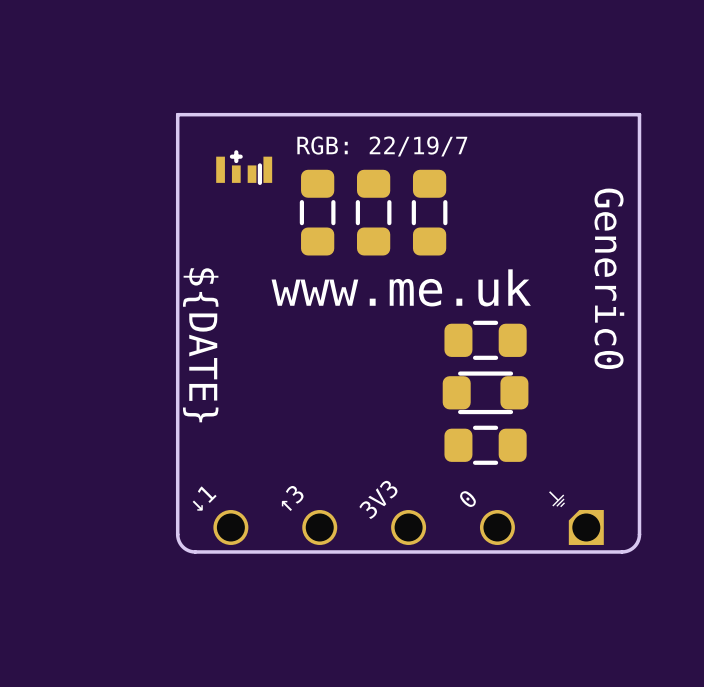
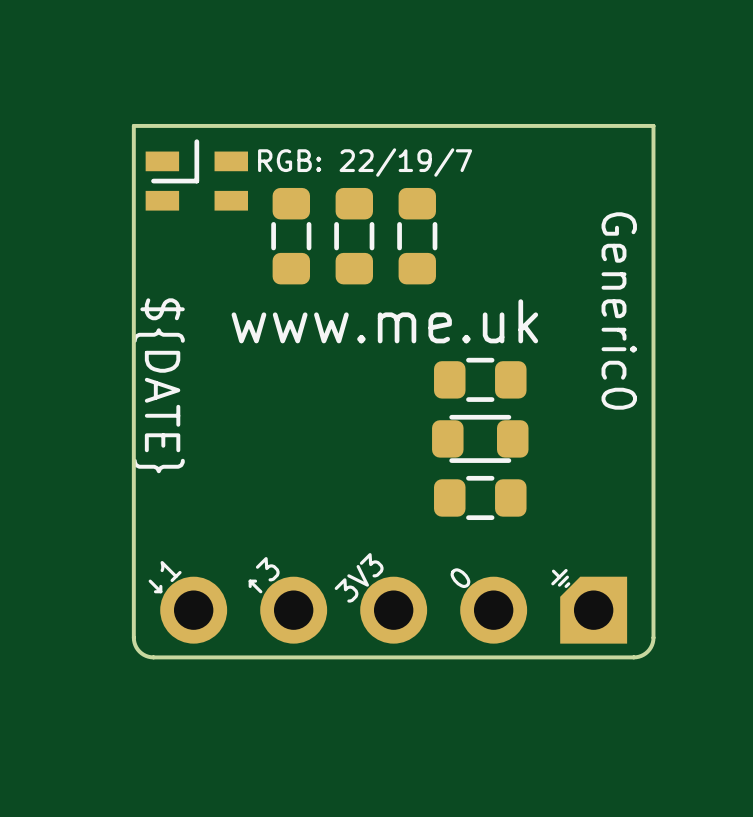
part footprint: [216, 150, 273, 186] -> [145, 139, 249, 211]
part footprint: [213, 510, 604, 545] -> [160, 576, 628, 644]
board edge: (639, 534) (634, 546) (622, 551) (195, 551) (182, 546) (177, 534) -> (653, 598) (652, 642) (645, 653) (633, 657) (150, 657) (141, 653) (134, 642) (133, 598)

